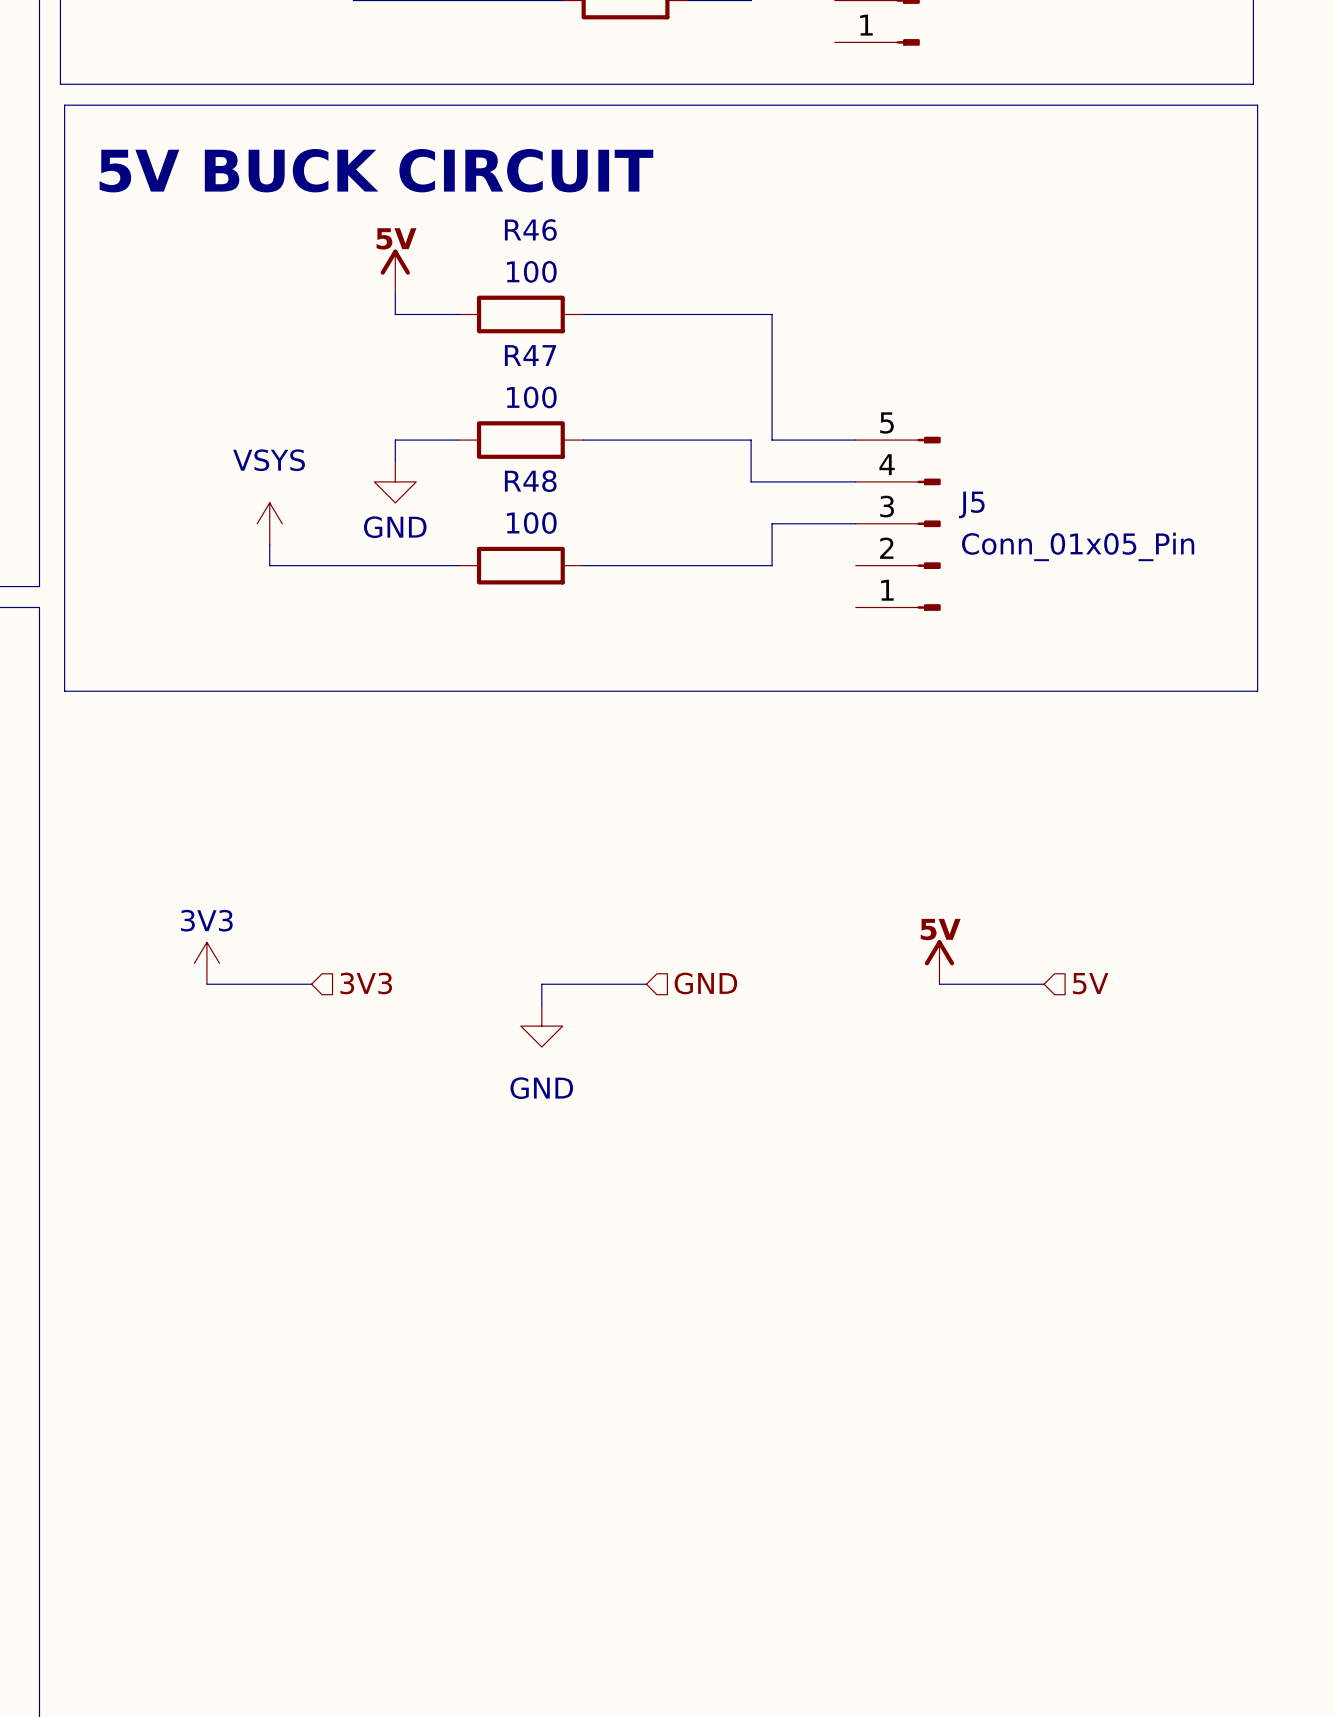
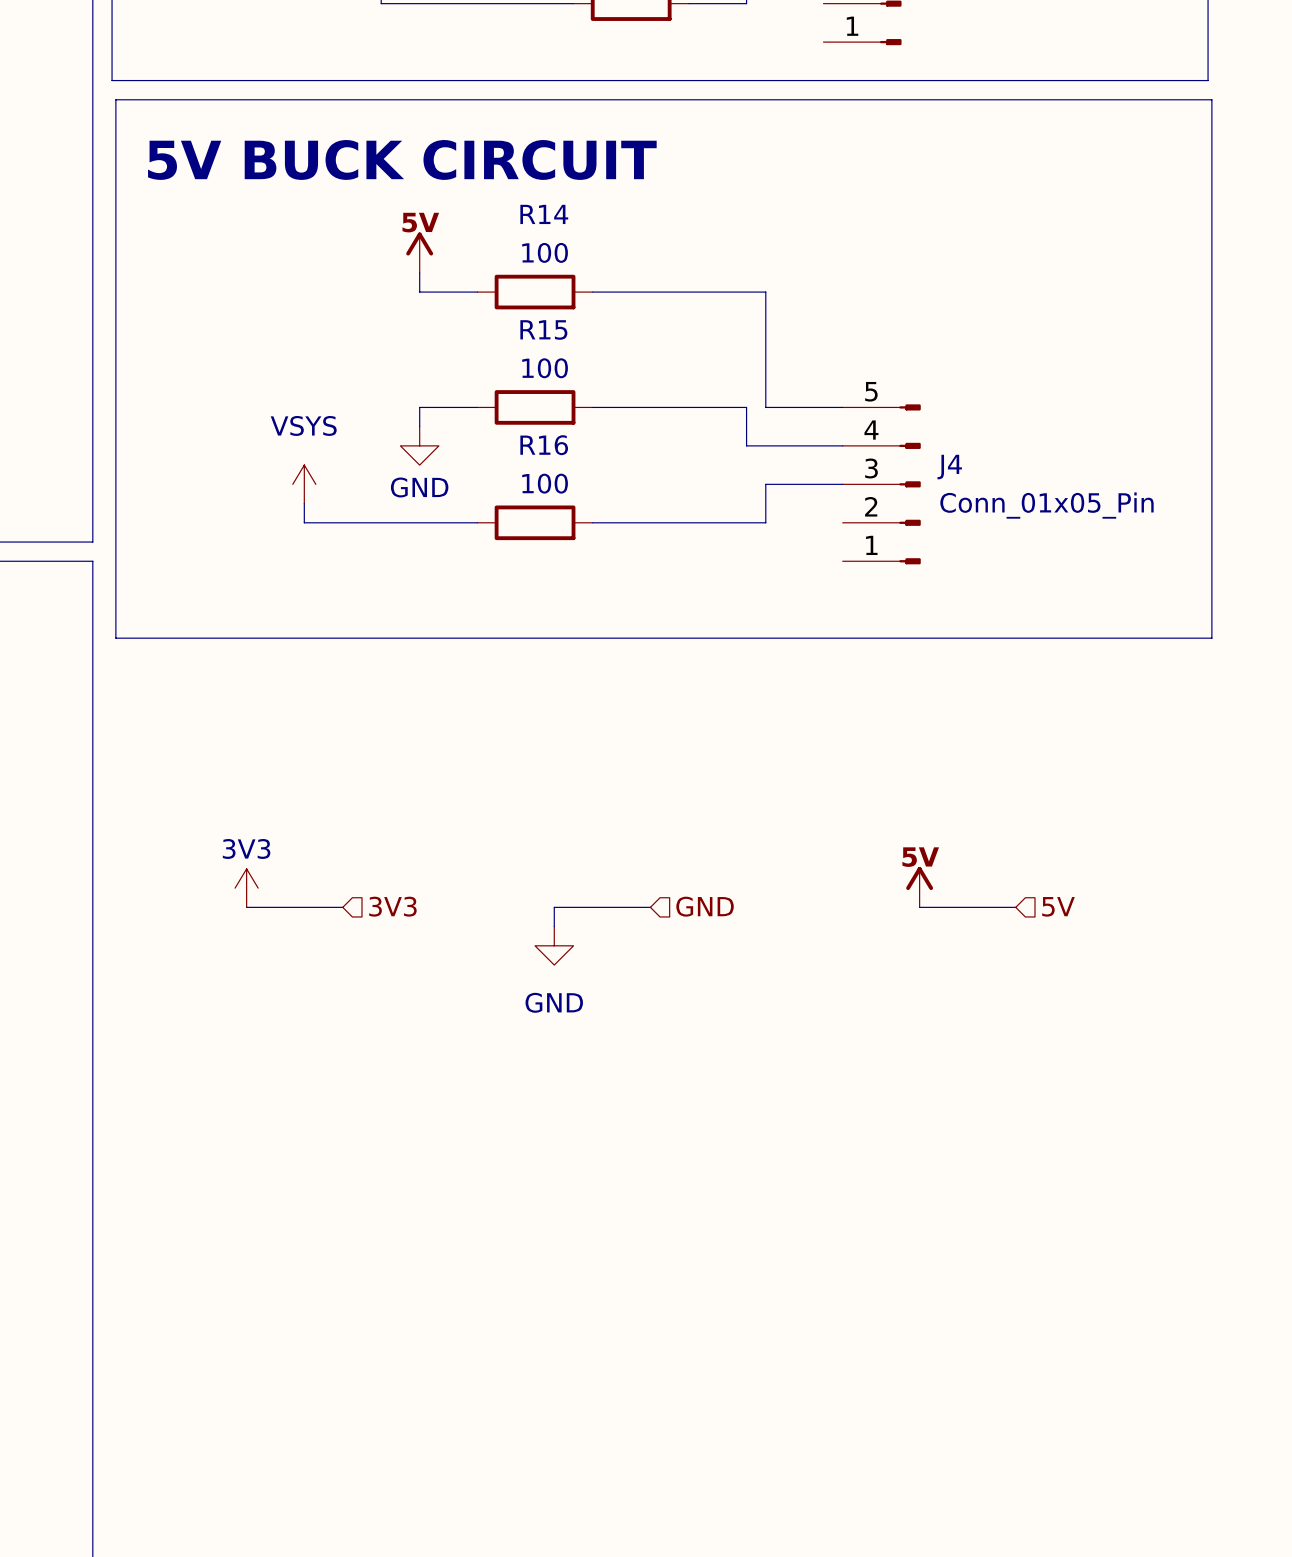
R46 name: R46 (530, 230) -> R14 (544, 214)
R47 name: R47 (530, 355) -> R15 (543, 329)
R48 name: R48 (530, 481) -> R16 (544, 445)
J5 name: J5 (971, 504) -> J4 (949, 467)

